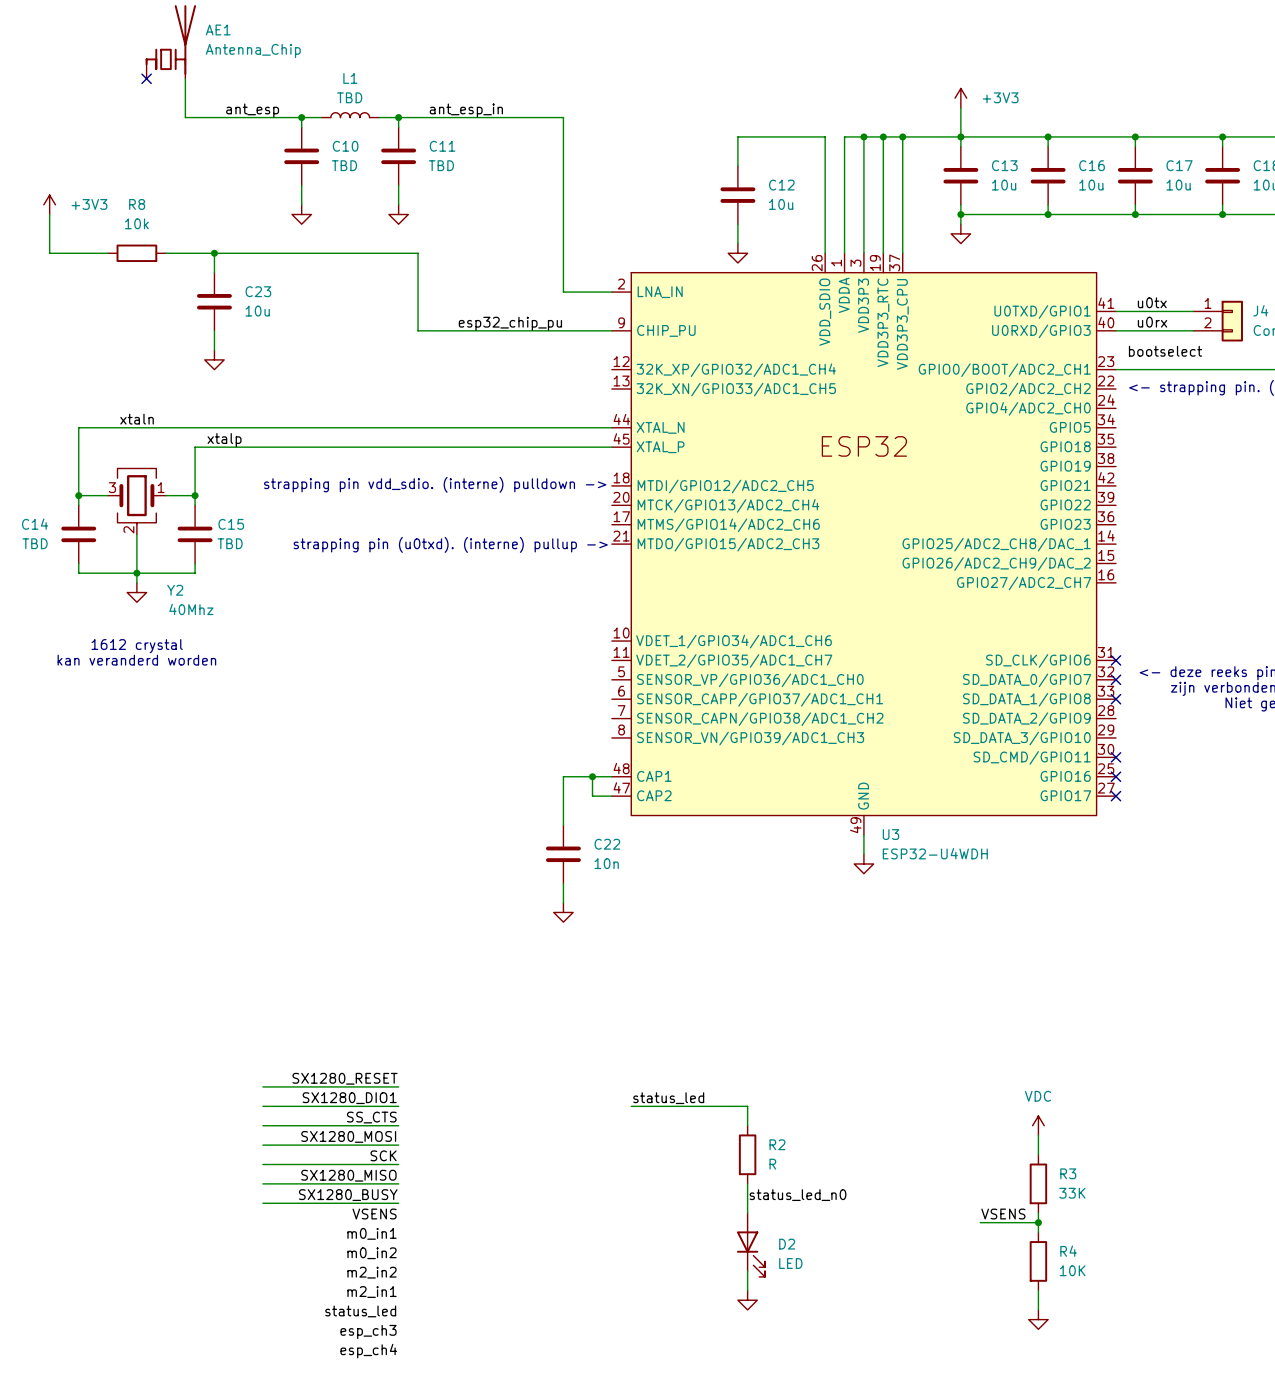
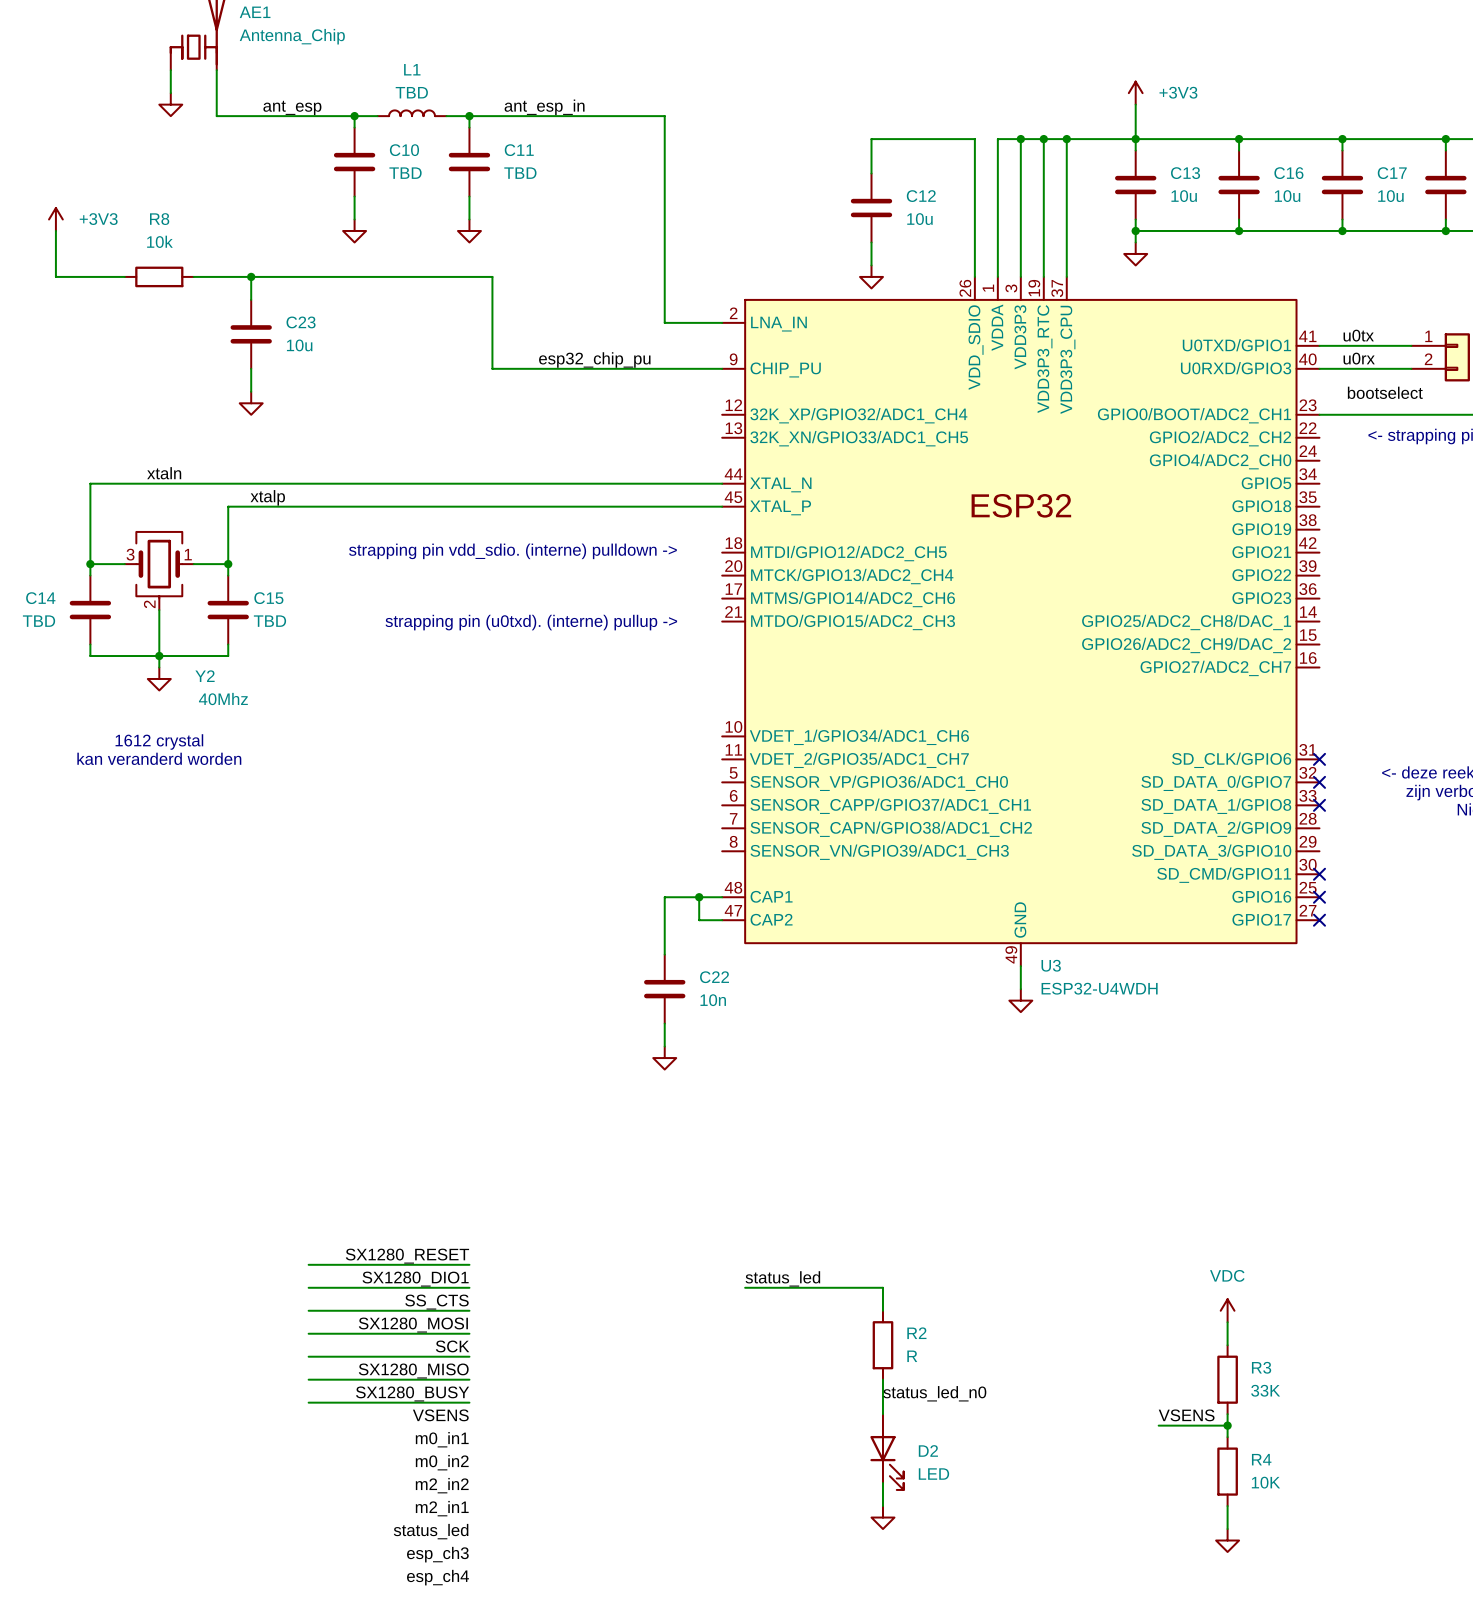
wire: none -> (170, 70) (170, 93)
no-connect mark: (146, 78) -> none
power symbol: none -> (170, 104)

